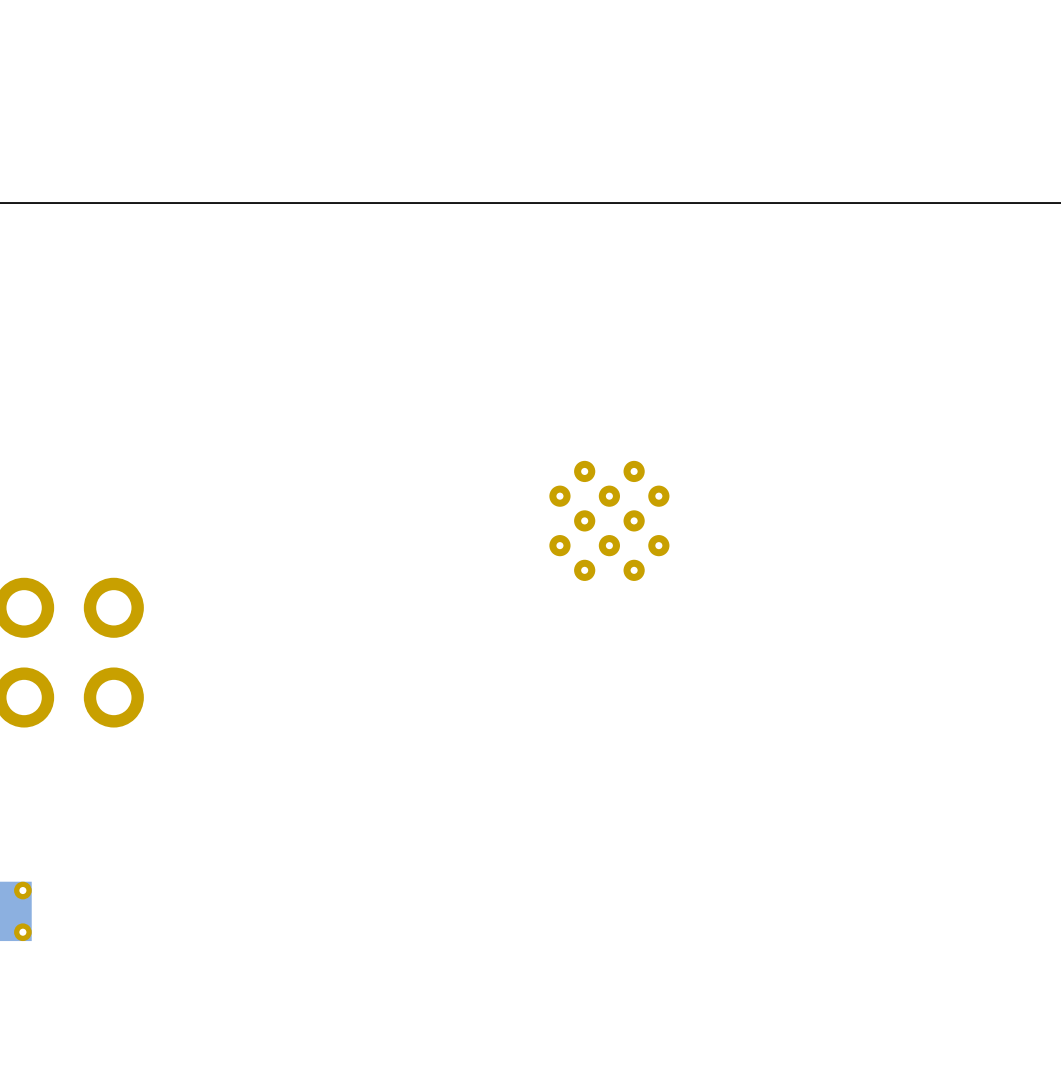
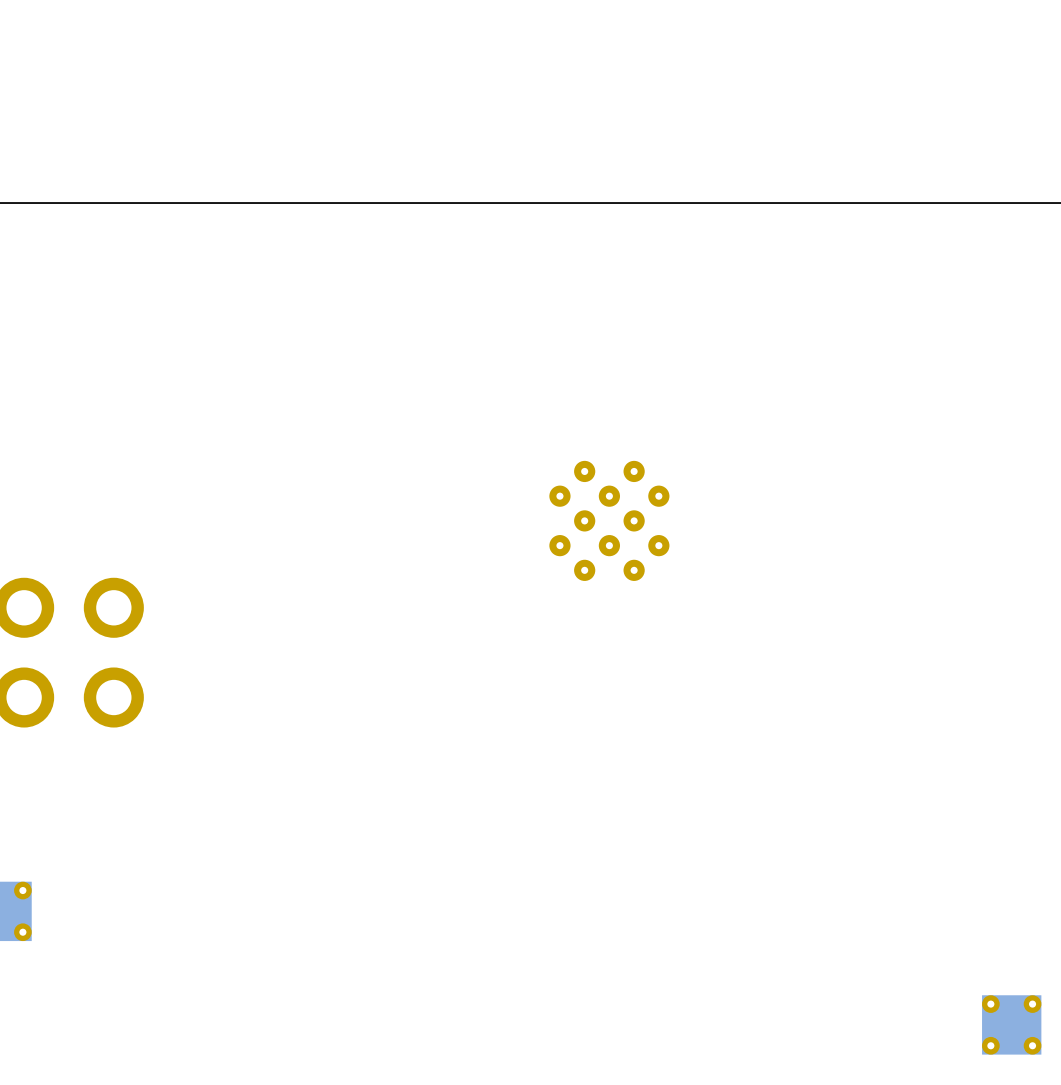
part: none -> (1011, 1024)

